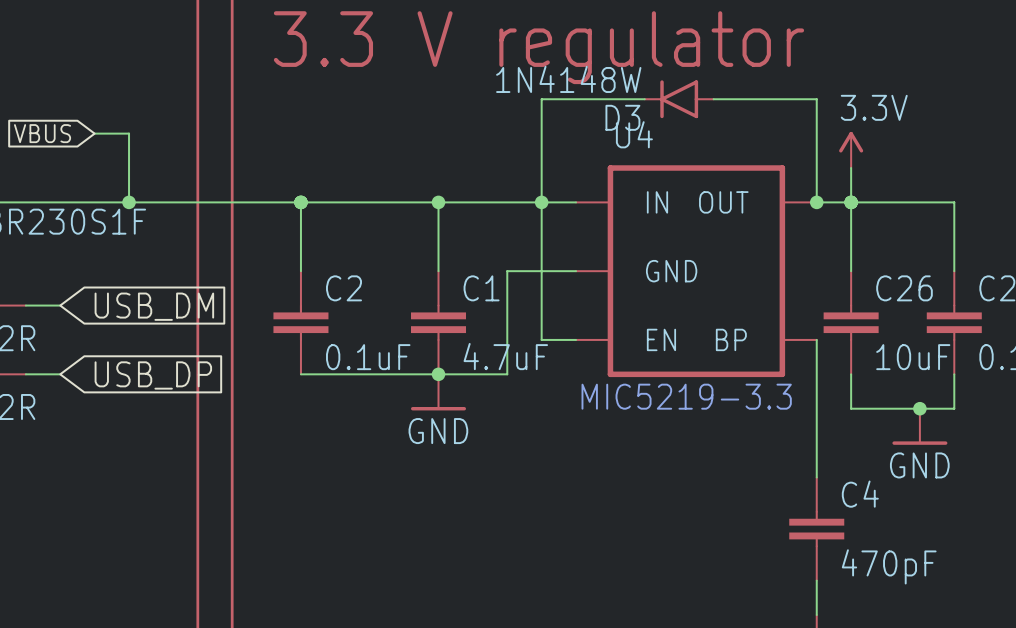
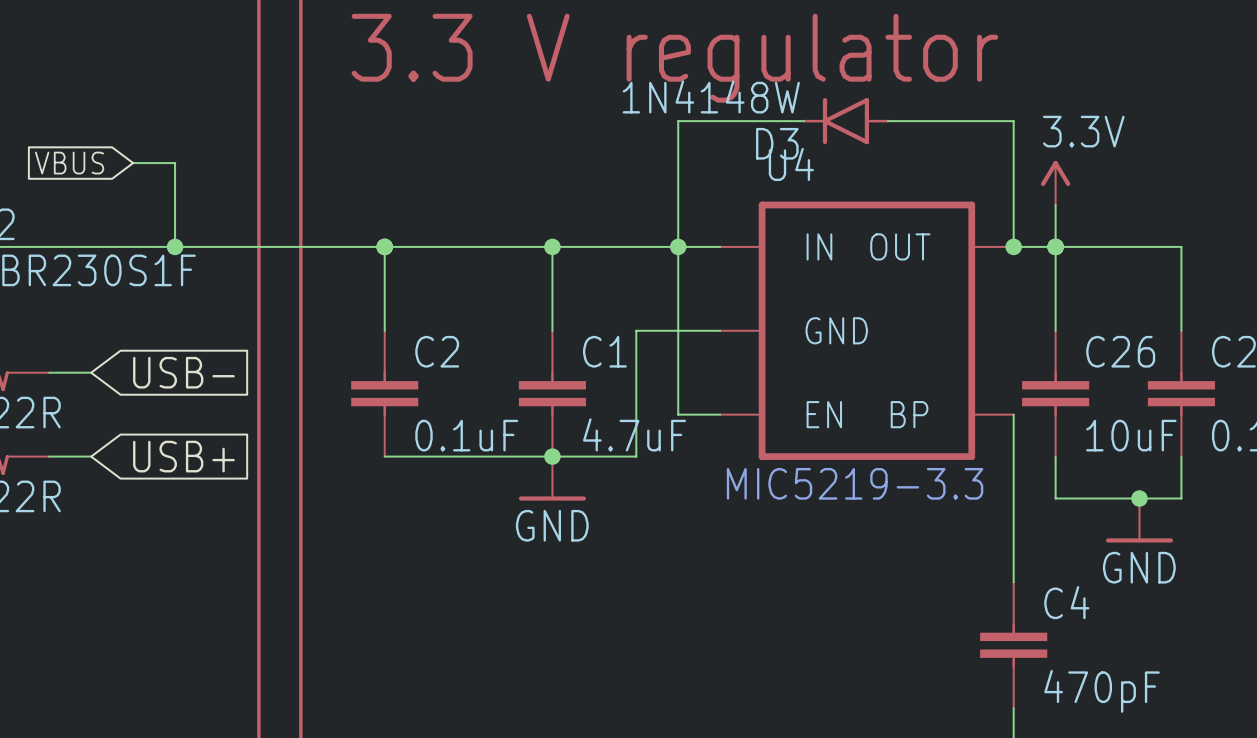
global label: USB_DM (154, 306) -> USB- (183, 372)
global label: USB_DP (153, 375) -> USB+ (183, 456)

